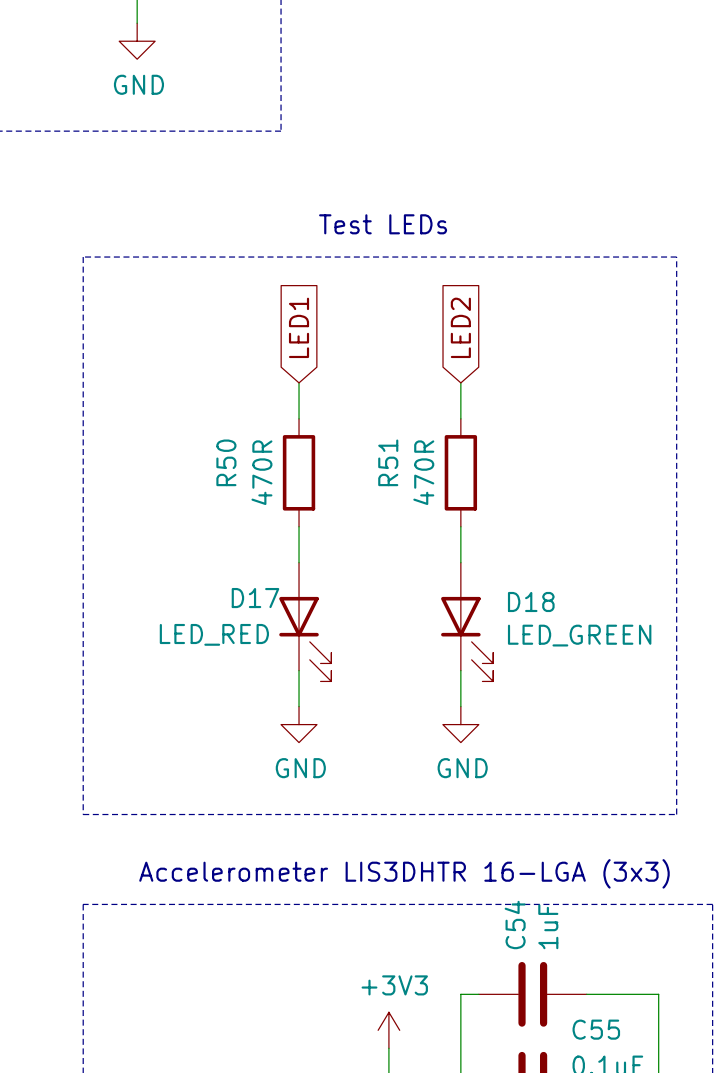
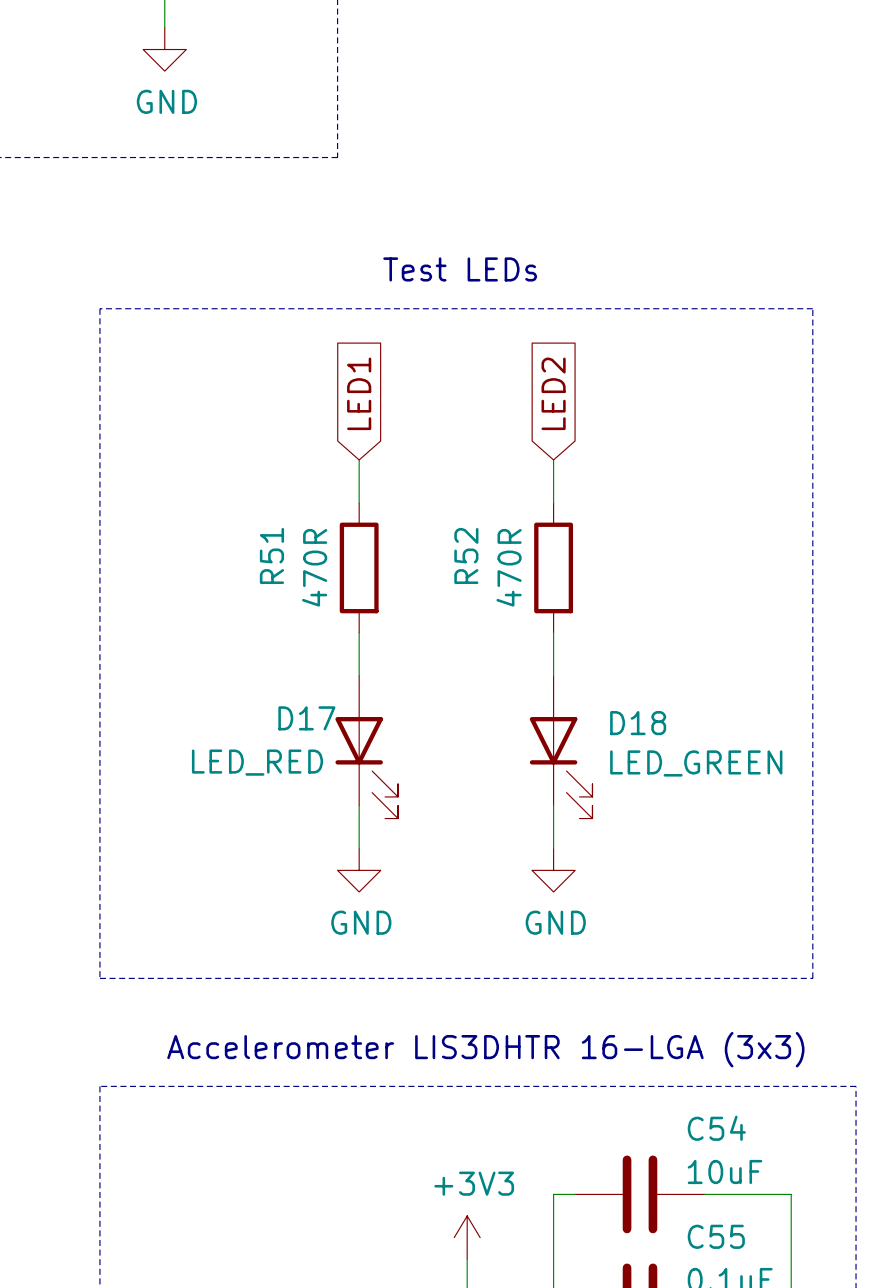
R50 name: R50 (226, 462) -> R51 (271, 555)
R51 name: R51 (388, 462) -> R52 (466, 555)
C54 name rotation: 0° (515, 925) -> 90° clockwise (716, 1128)
C54 name position: C54 (515, 925) -> C54 (716, 1128)
C54 value: 1uF (548, 926) -> 10uF (725, 1172)

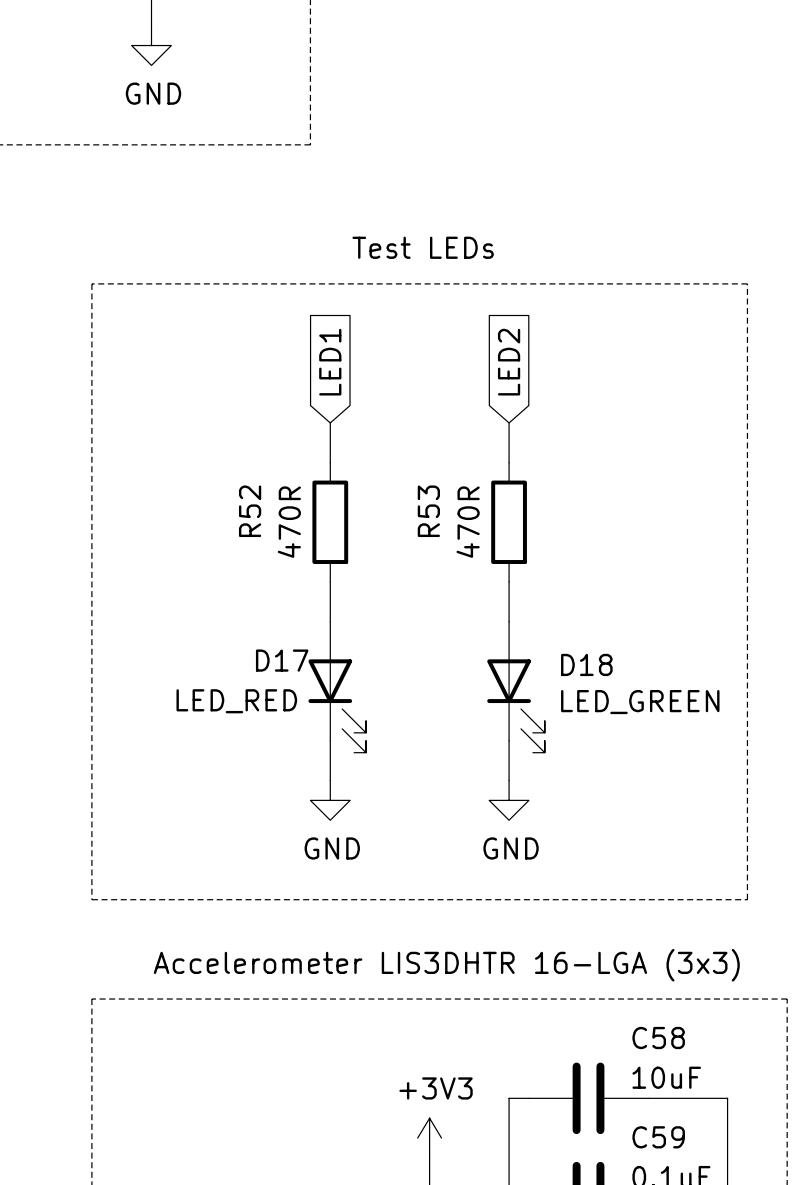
R51 name: R51 (271, 555) -> R52 (250, 511)
R52 name: R52 (466, 555) -> R53 (428, 511)
C54 name: C54 (716, 1128) -> C58 (658, 1038)
C55 name: C55 (716, 1236) -> C59 (658, 1137)

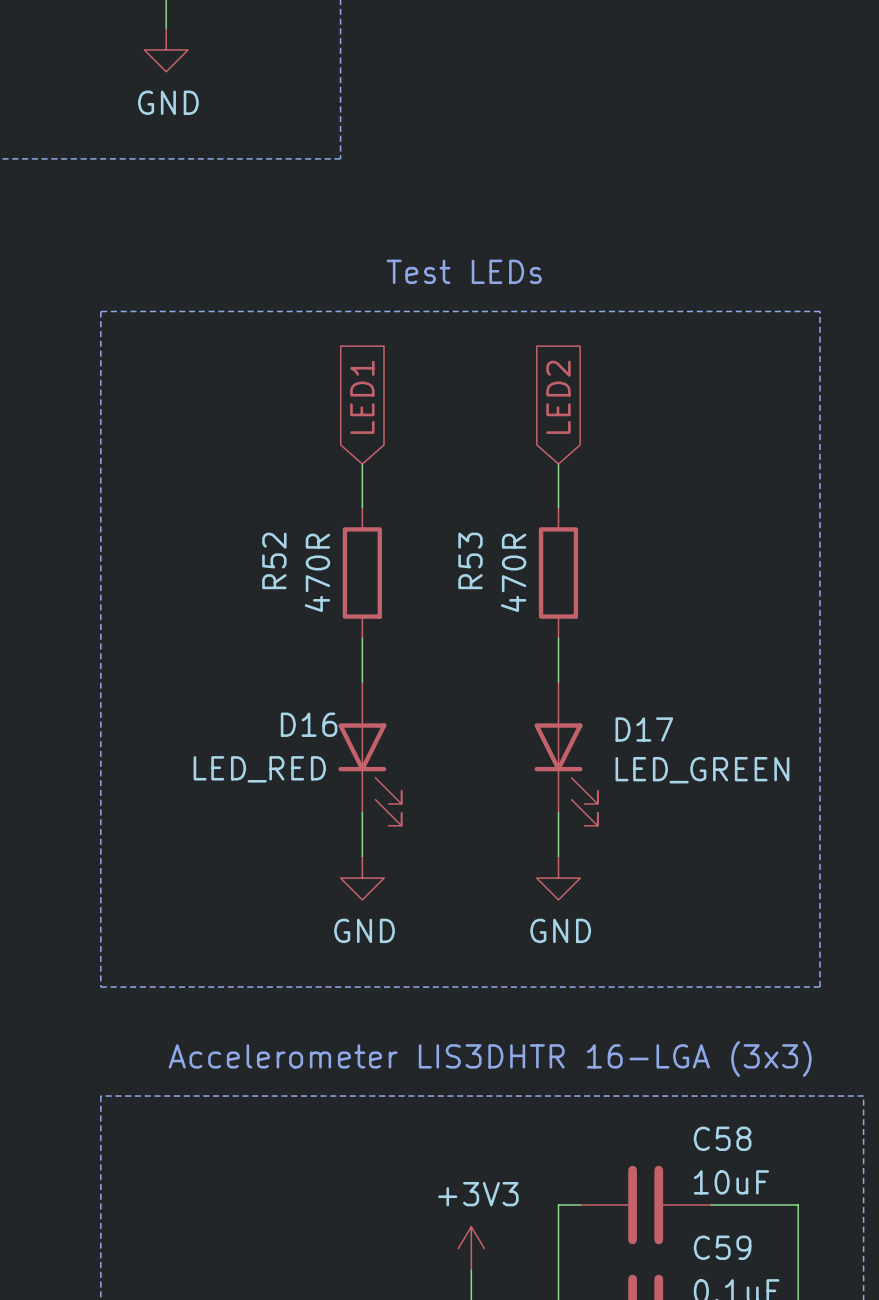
D17 name: D17 (282, 660) -> D16 (309, 724)
D18 name: D18 (586, 664) -> D17 (644, 729)

